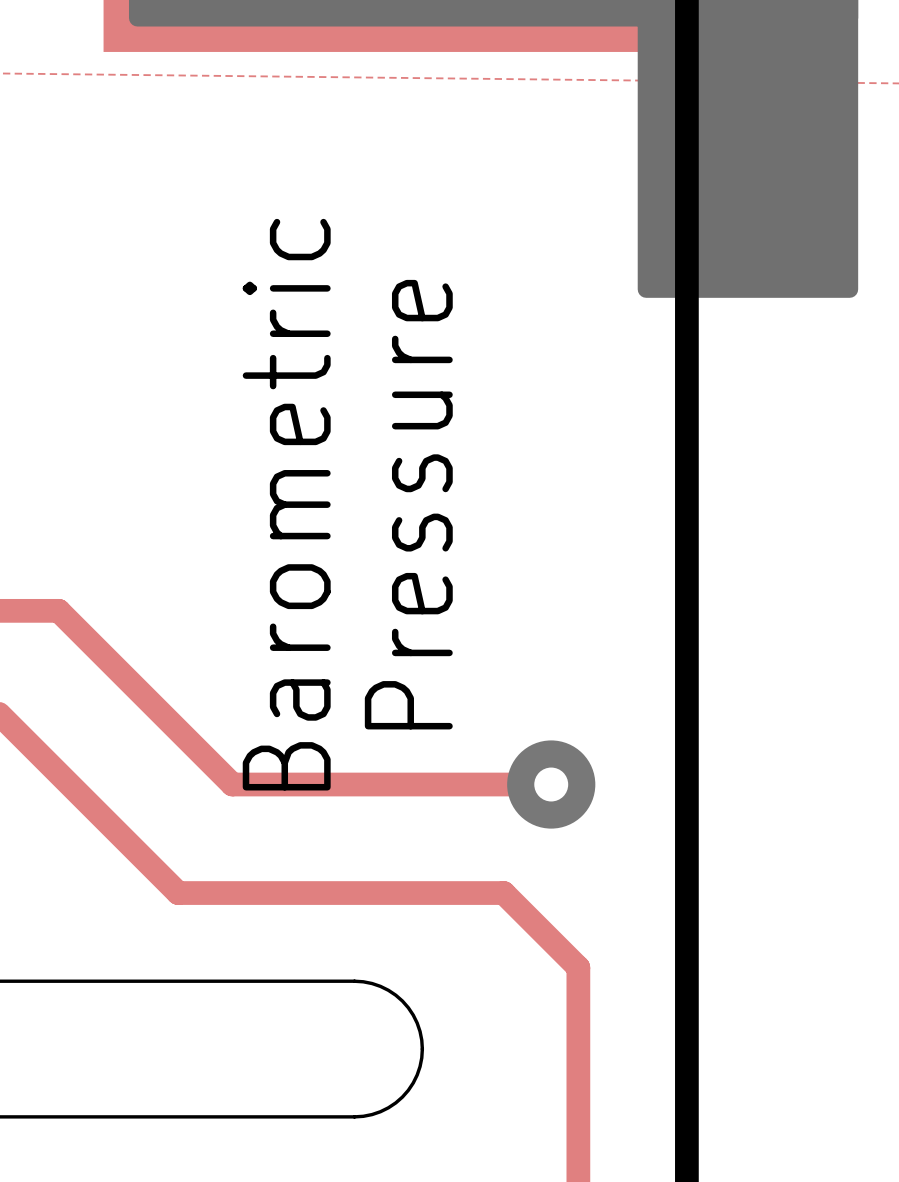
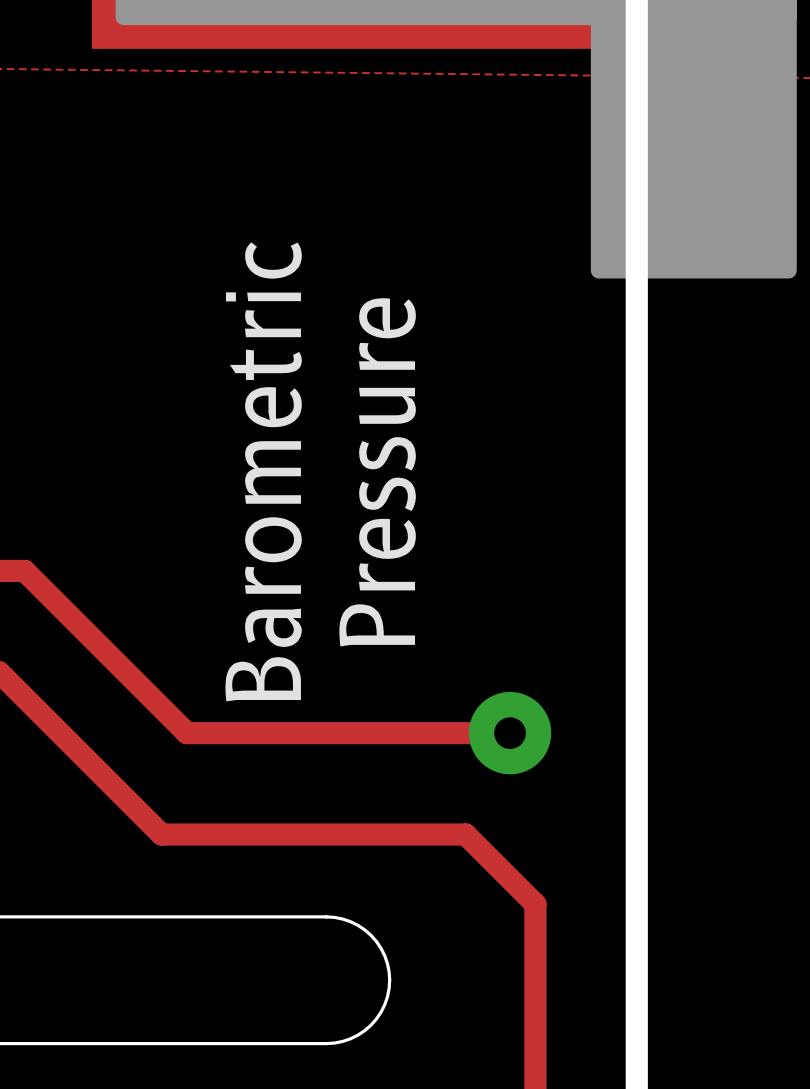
track: (31, 610) (58, 610) (232, 784) -> (24, 570) (186, 733) (212, 733)

